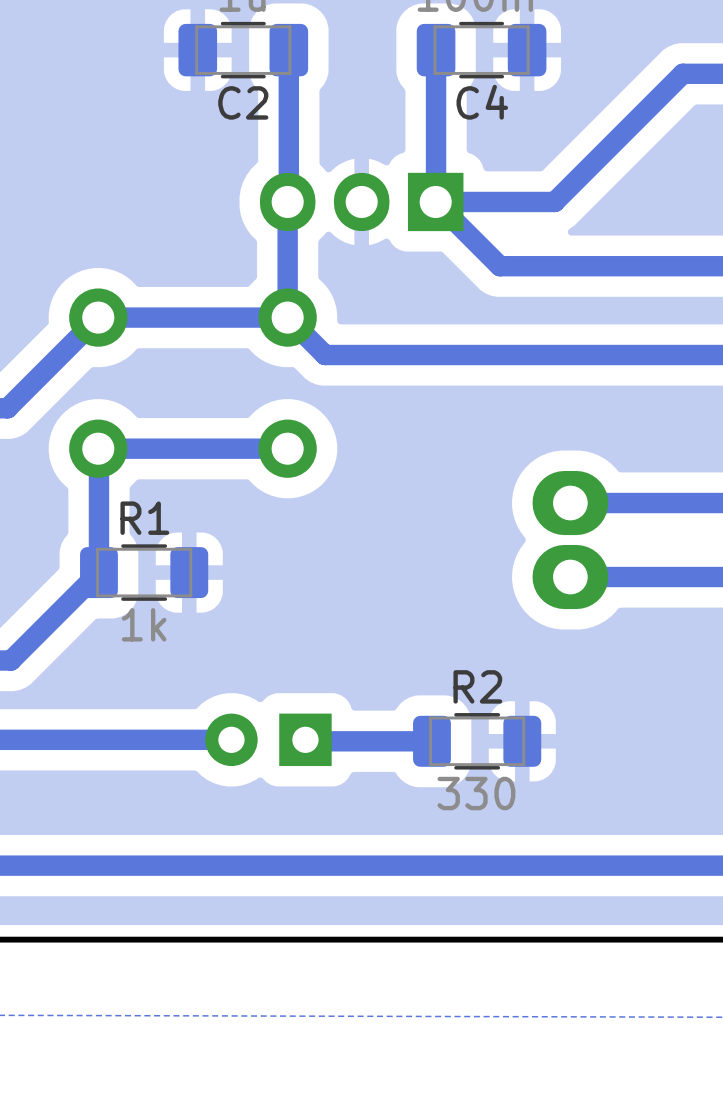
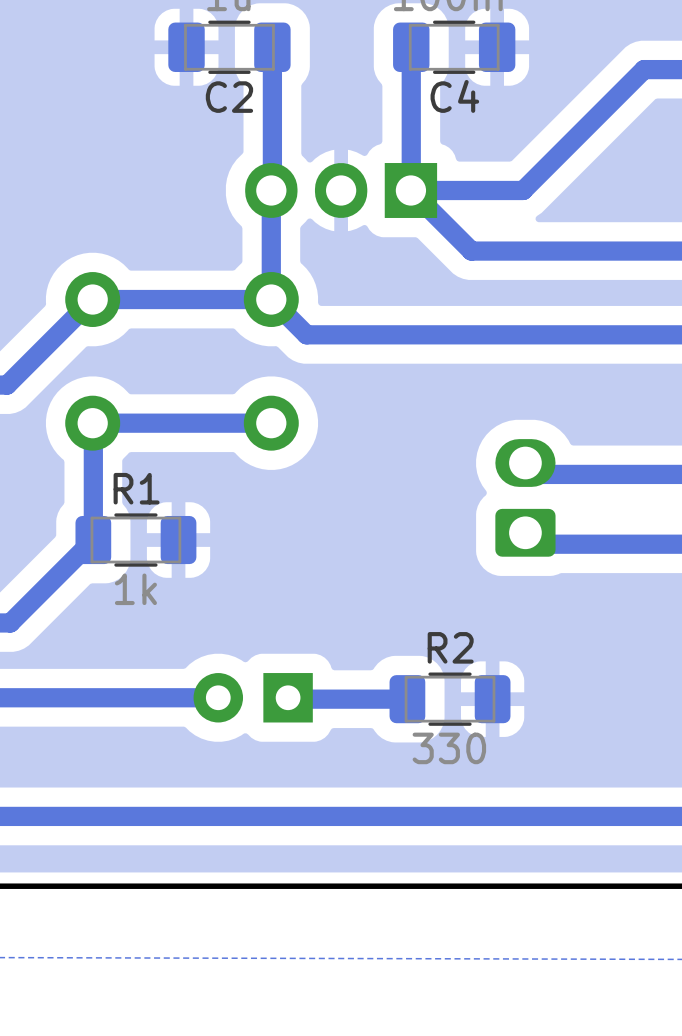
part footprint: [532, 470, 609, 610] -> [495, 439, 556, 557]

